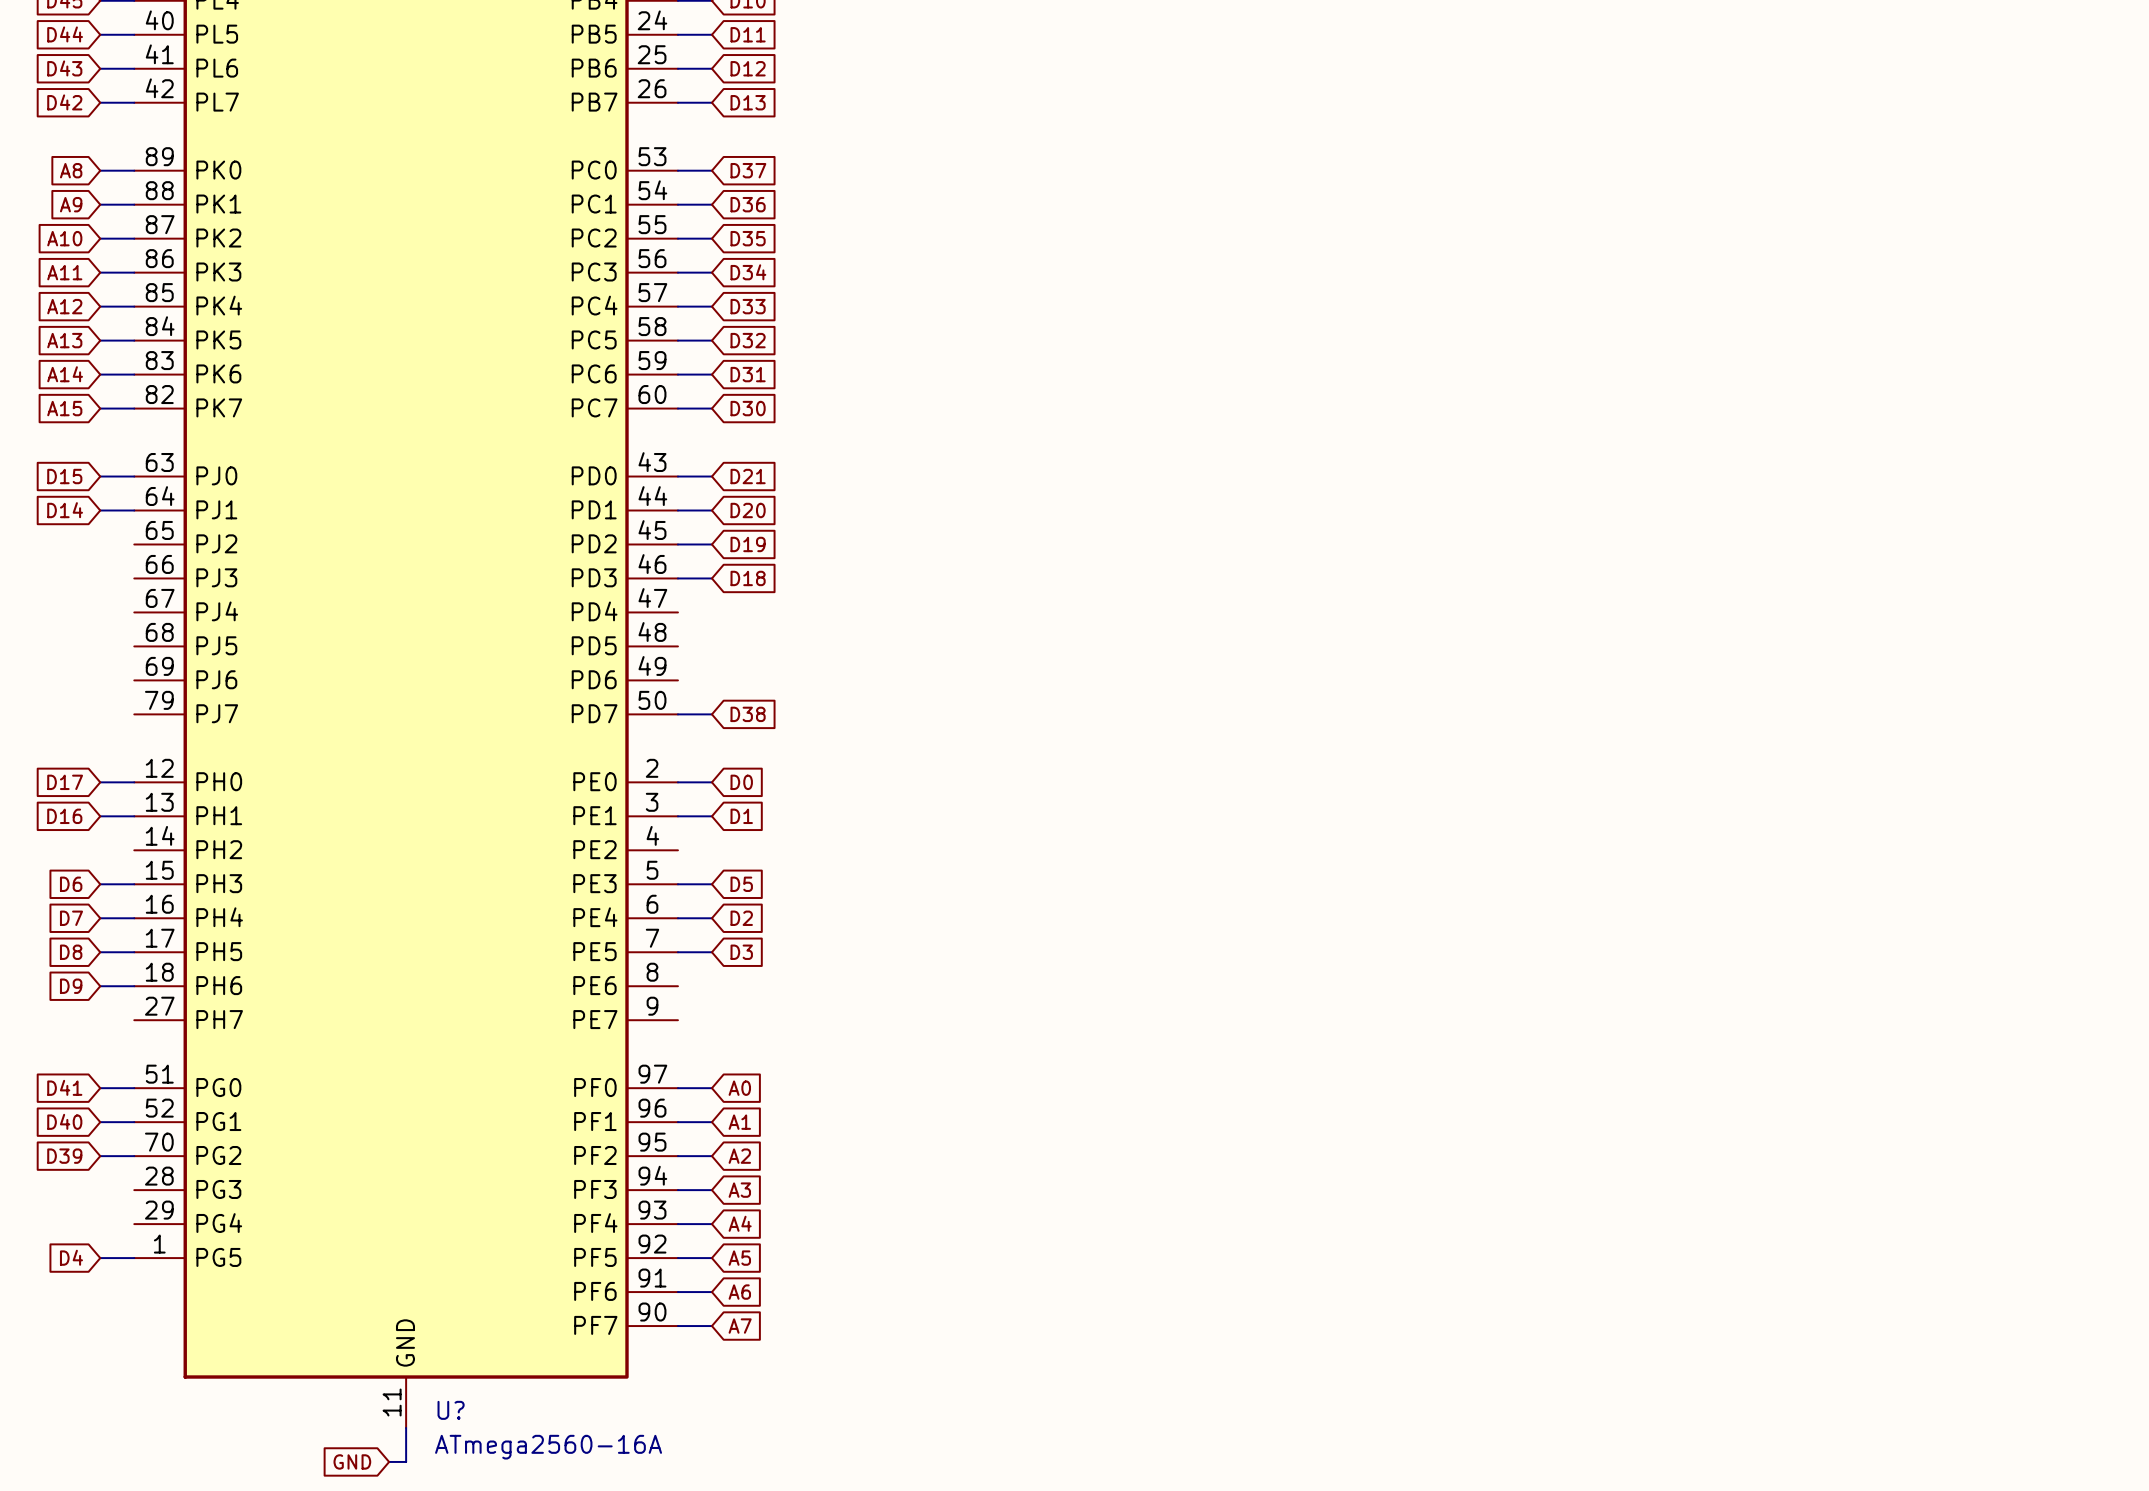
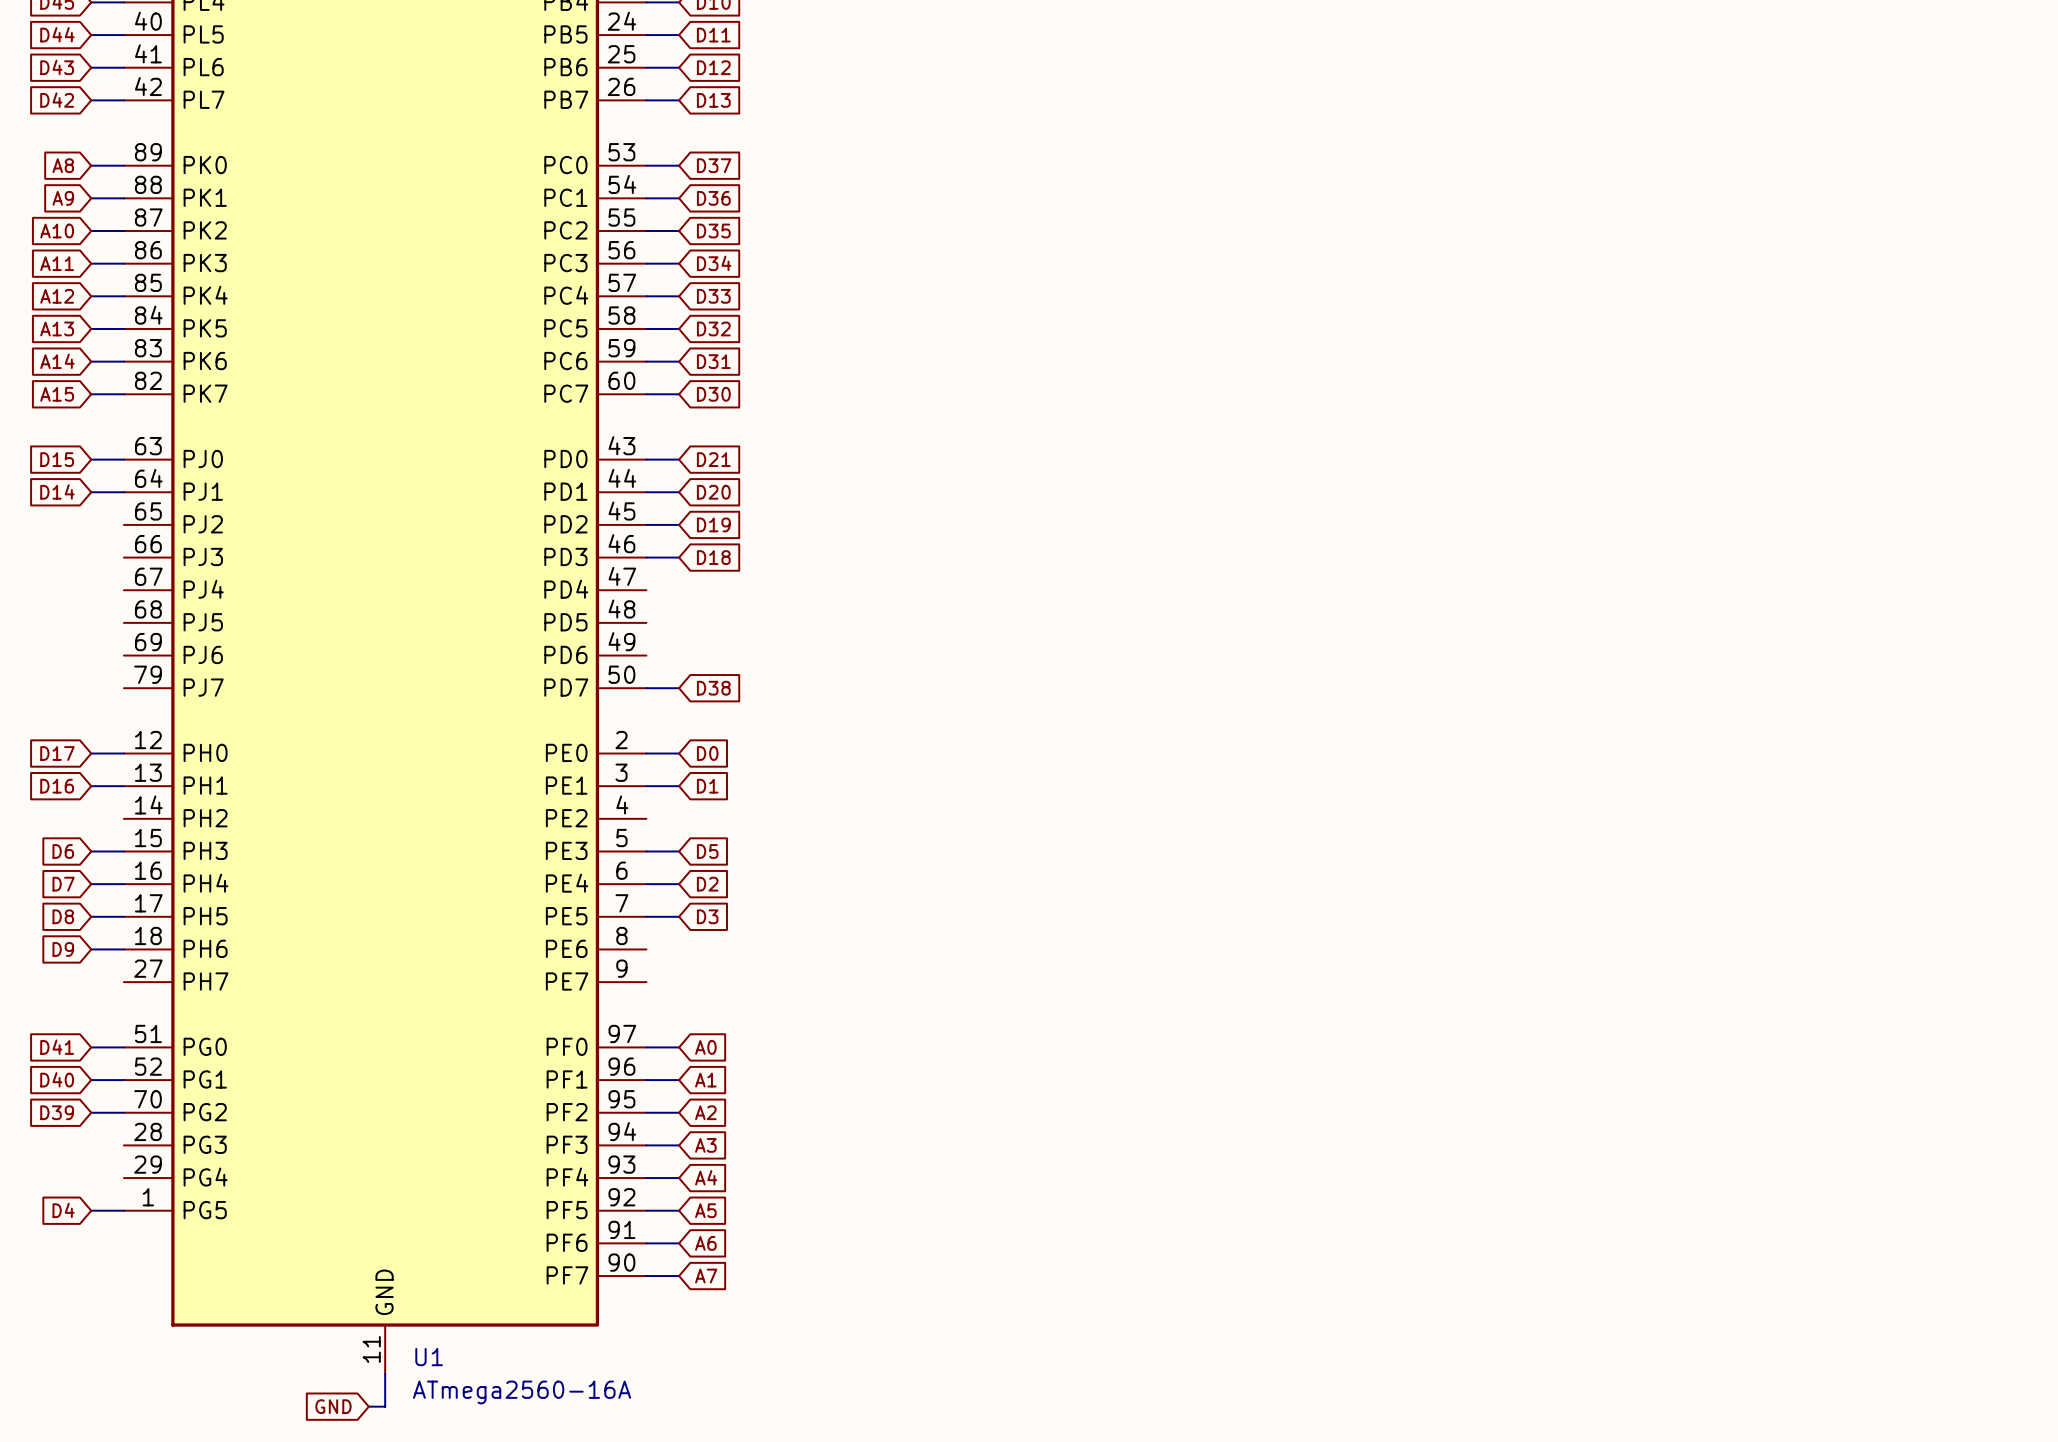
U? name: U? (451, 1410) -> U1 (429, 1357)

